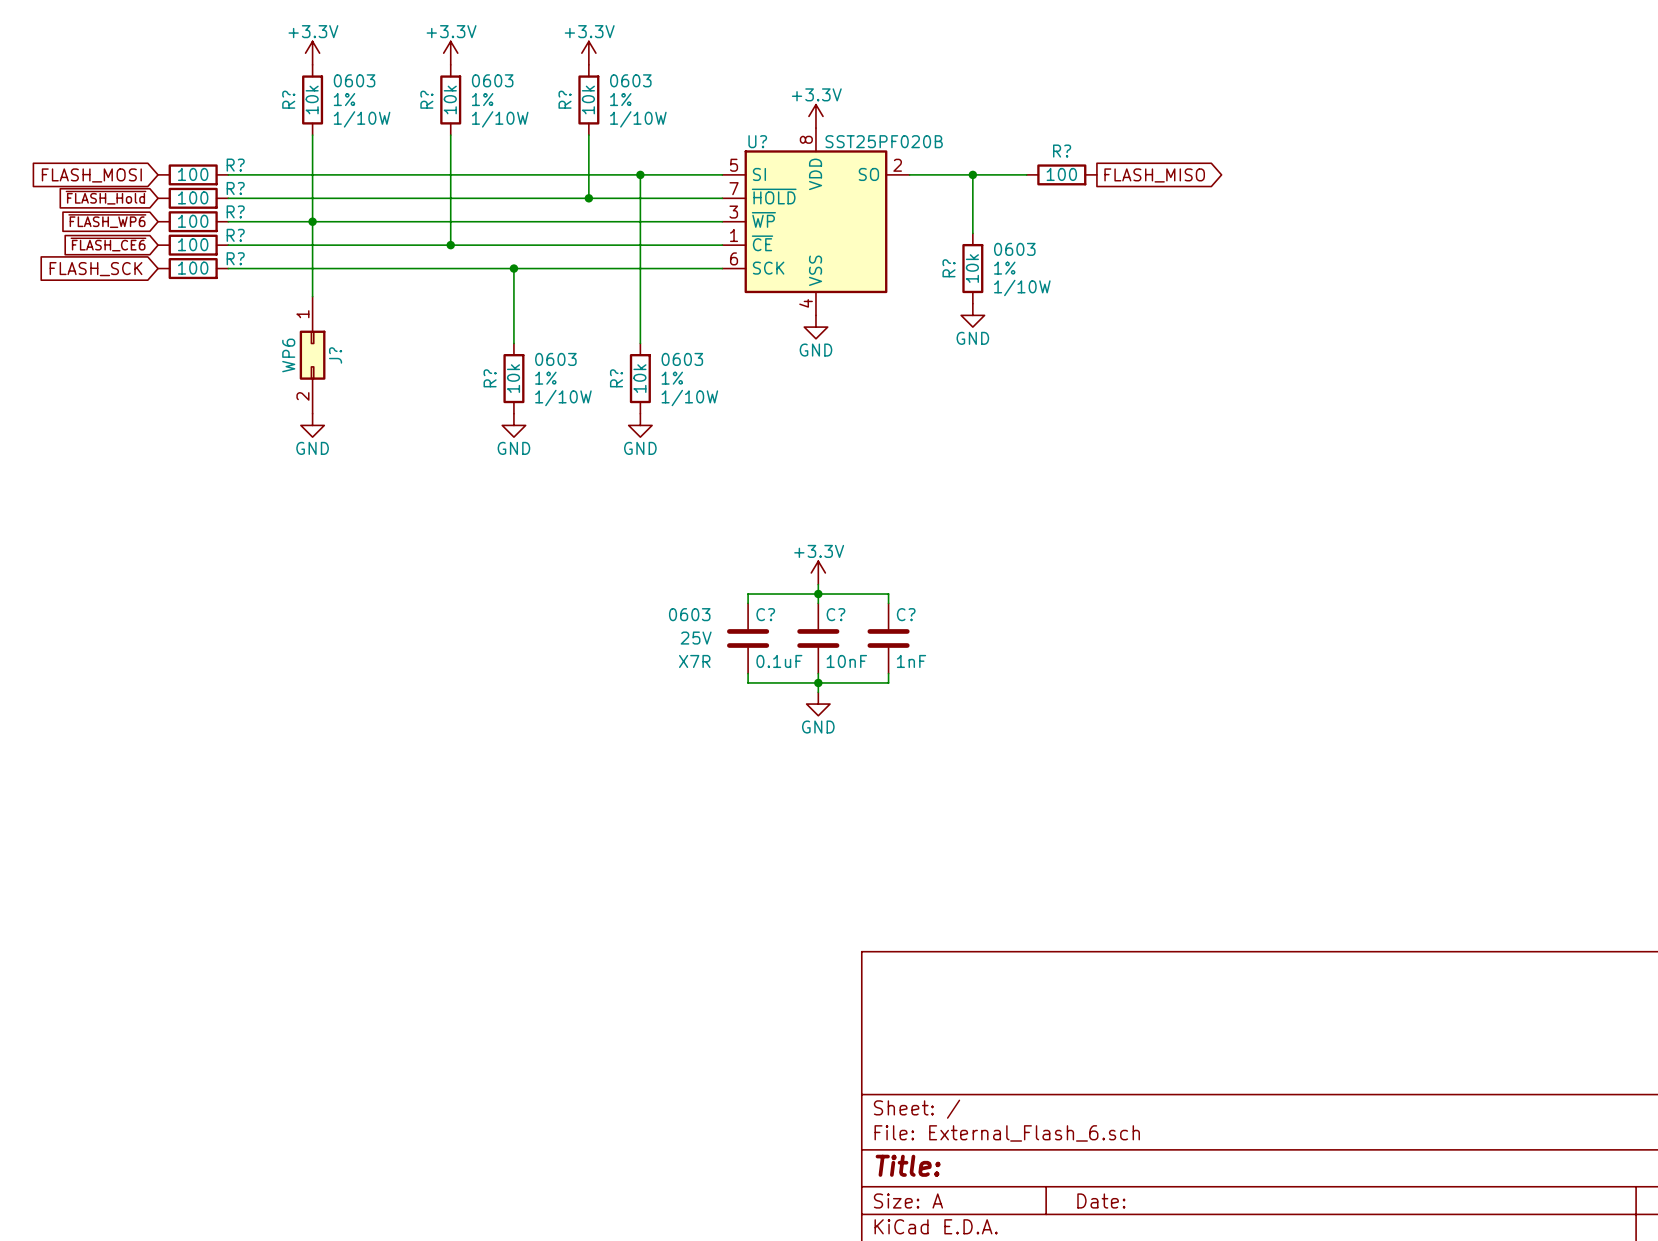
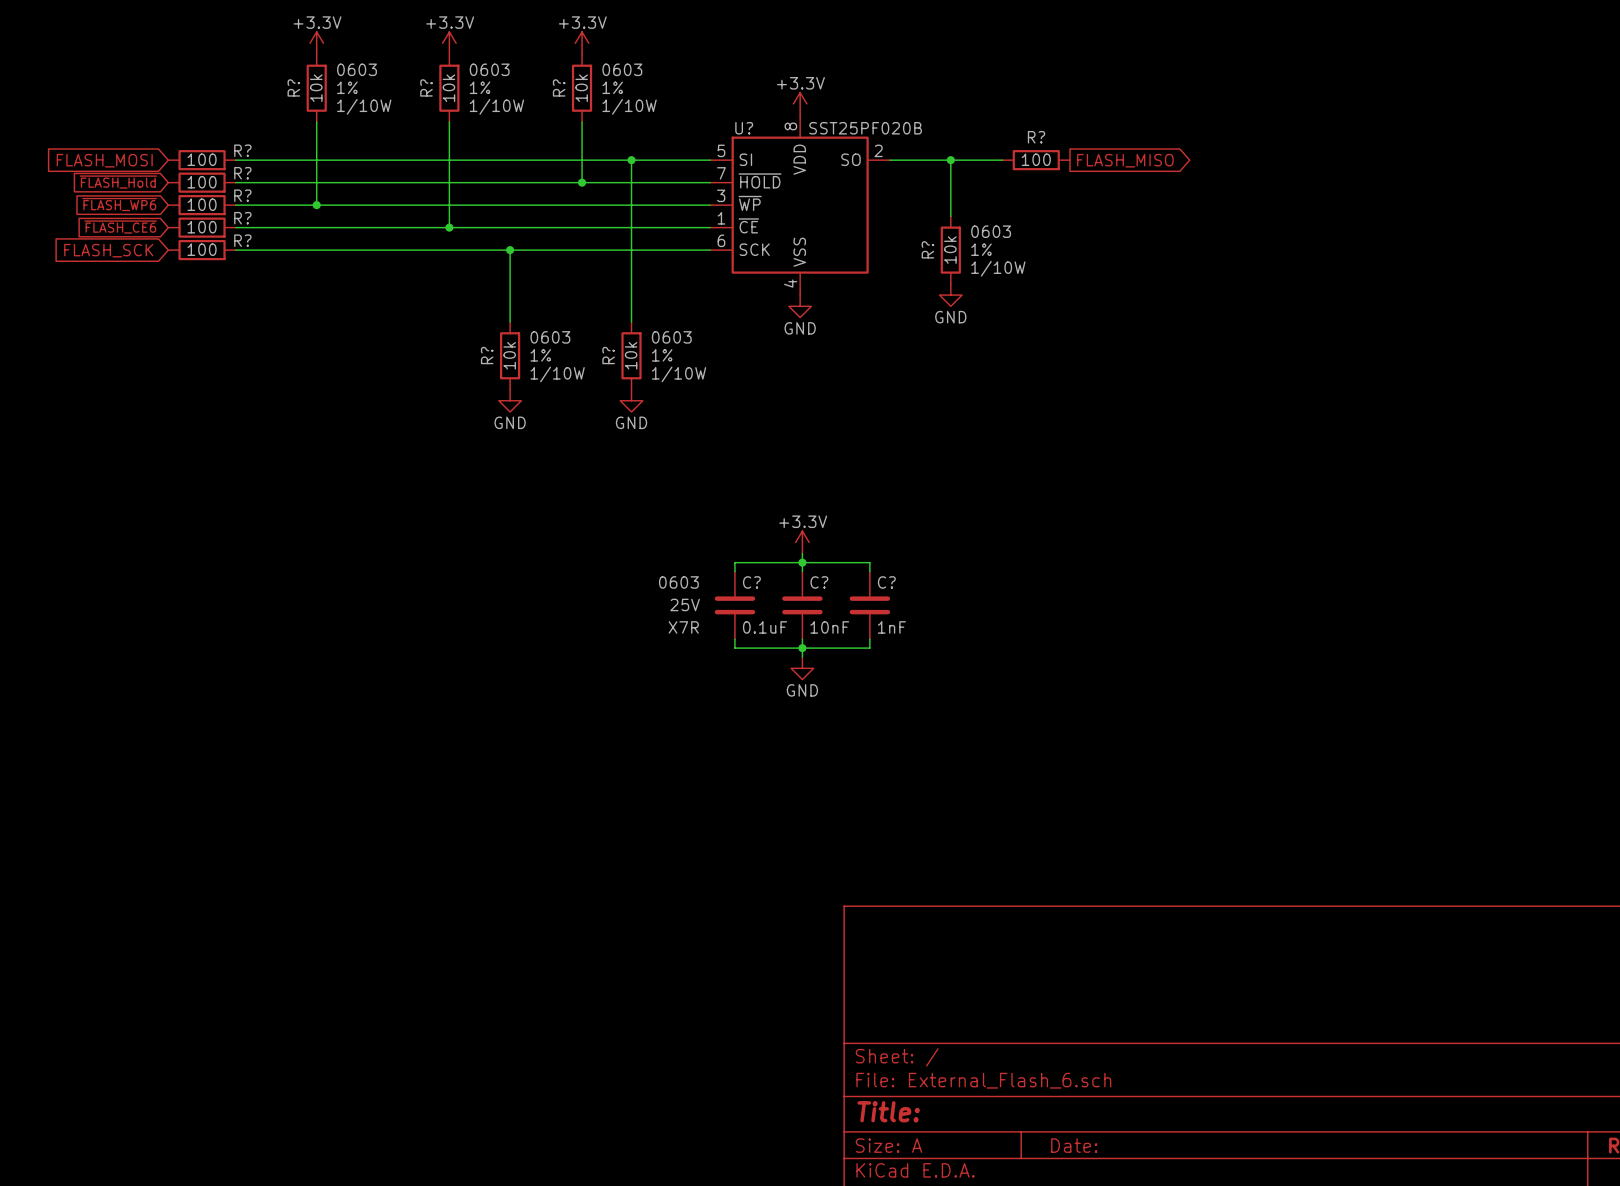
wire: (312, 221) (312, 296) -> none
J?: WP6 (312, 355) -> none
power symbol: GND (312, 425) -> none

